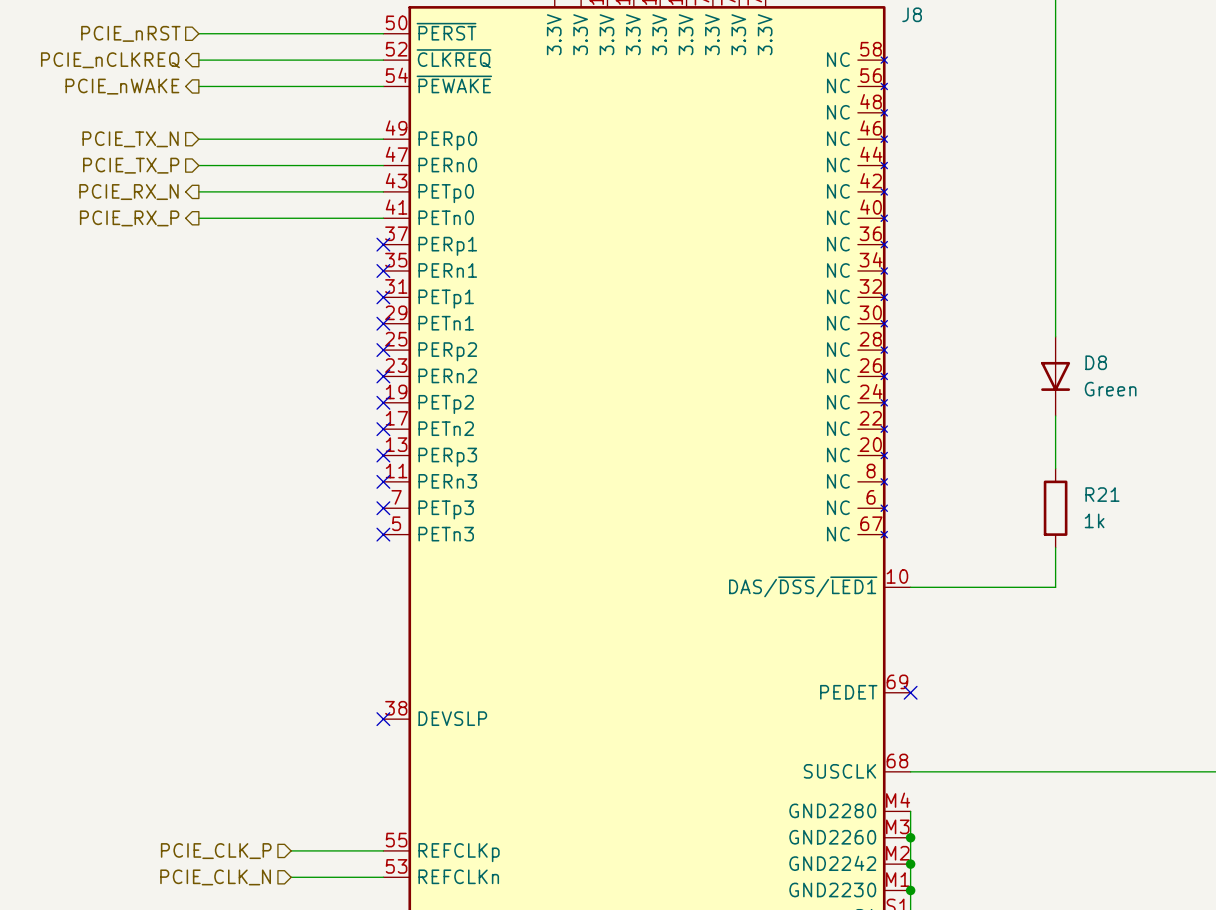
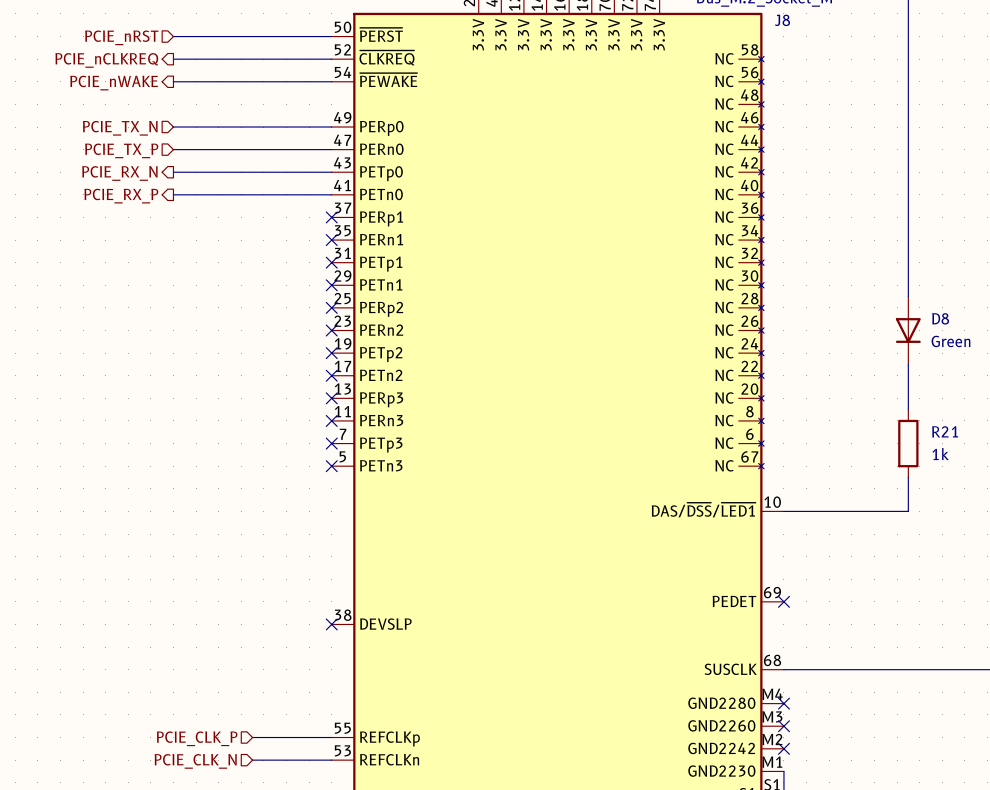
wire: (910, 811) (910, 890) -> none
no-connect mark: none -> (783, 703)
junction: (910, 837) -> none
no-connect mark: none -> (783, 726)
junction: (910, 864) -> none
no-connect mark: none -> (783, 748)
junction: (910, 890) -> none

